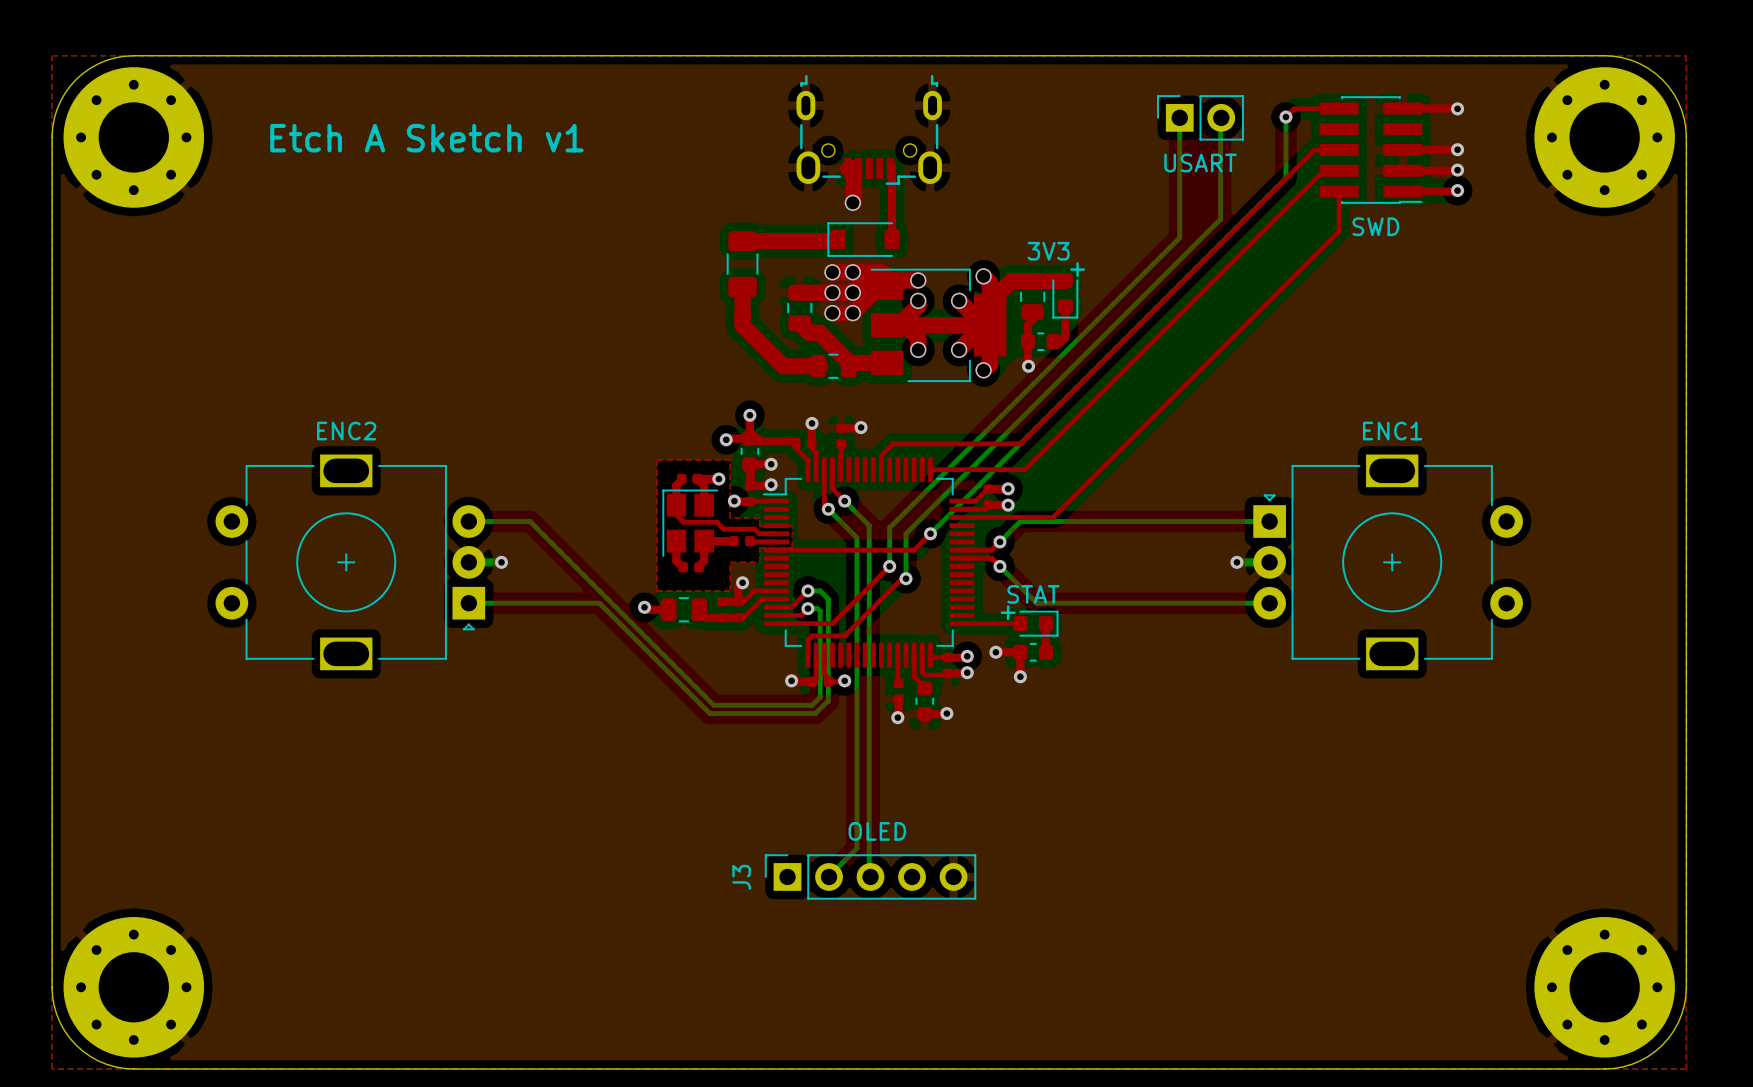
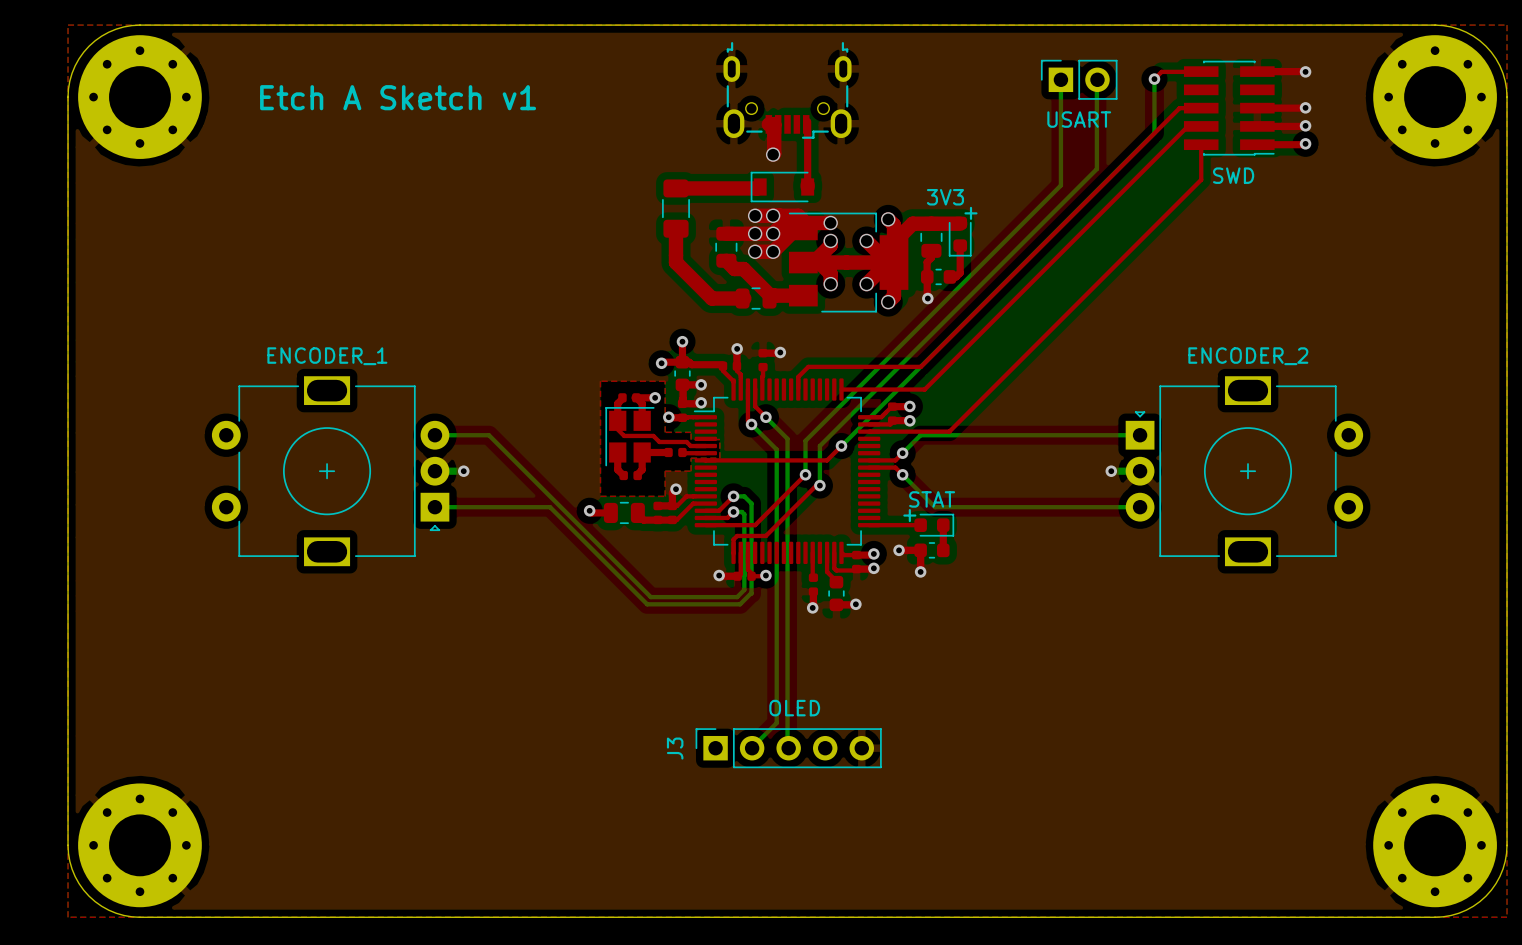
text: ENC2 (346, 431) -> ENCODER_1 (327, 356)
text: ENC1 (1392, 431) -> ENCODER_2 (1248, 356)

